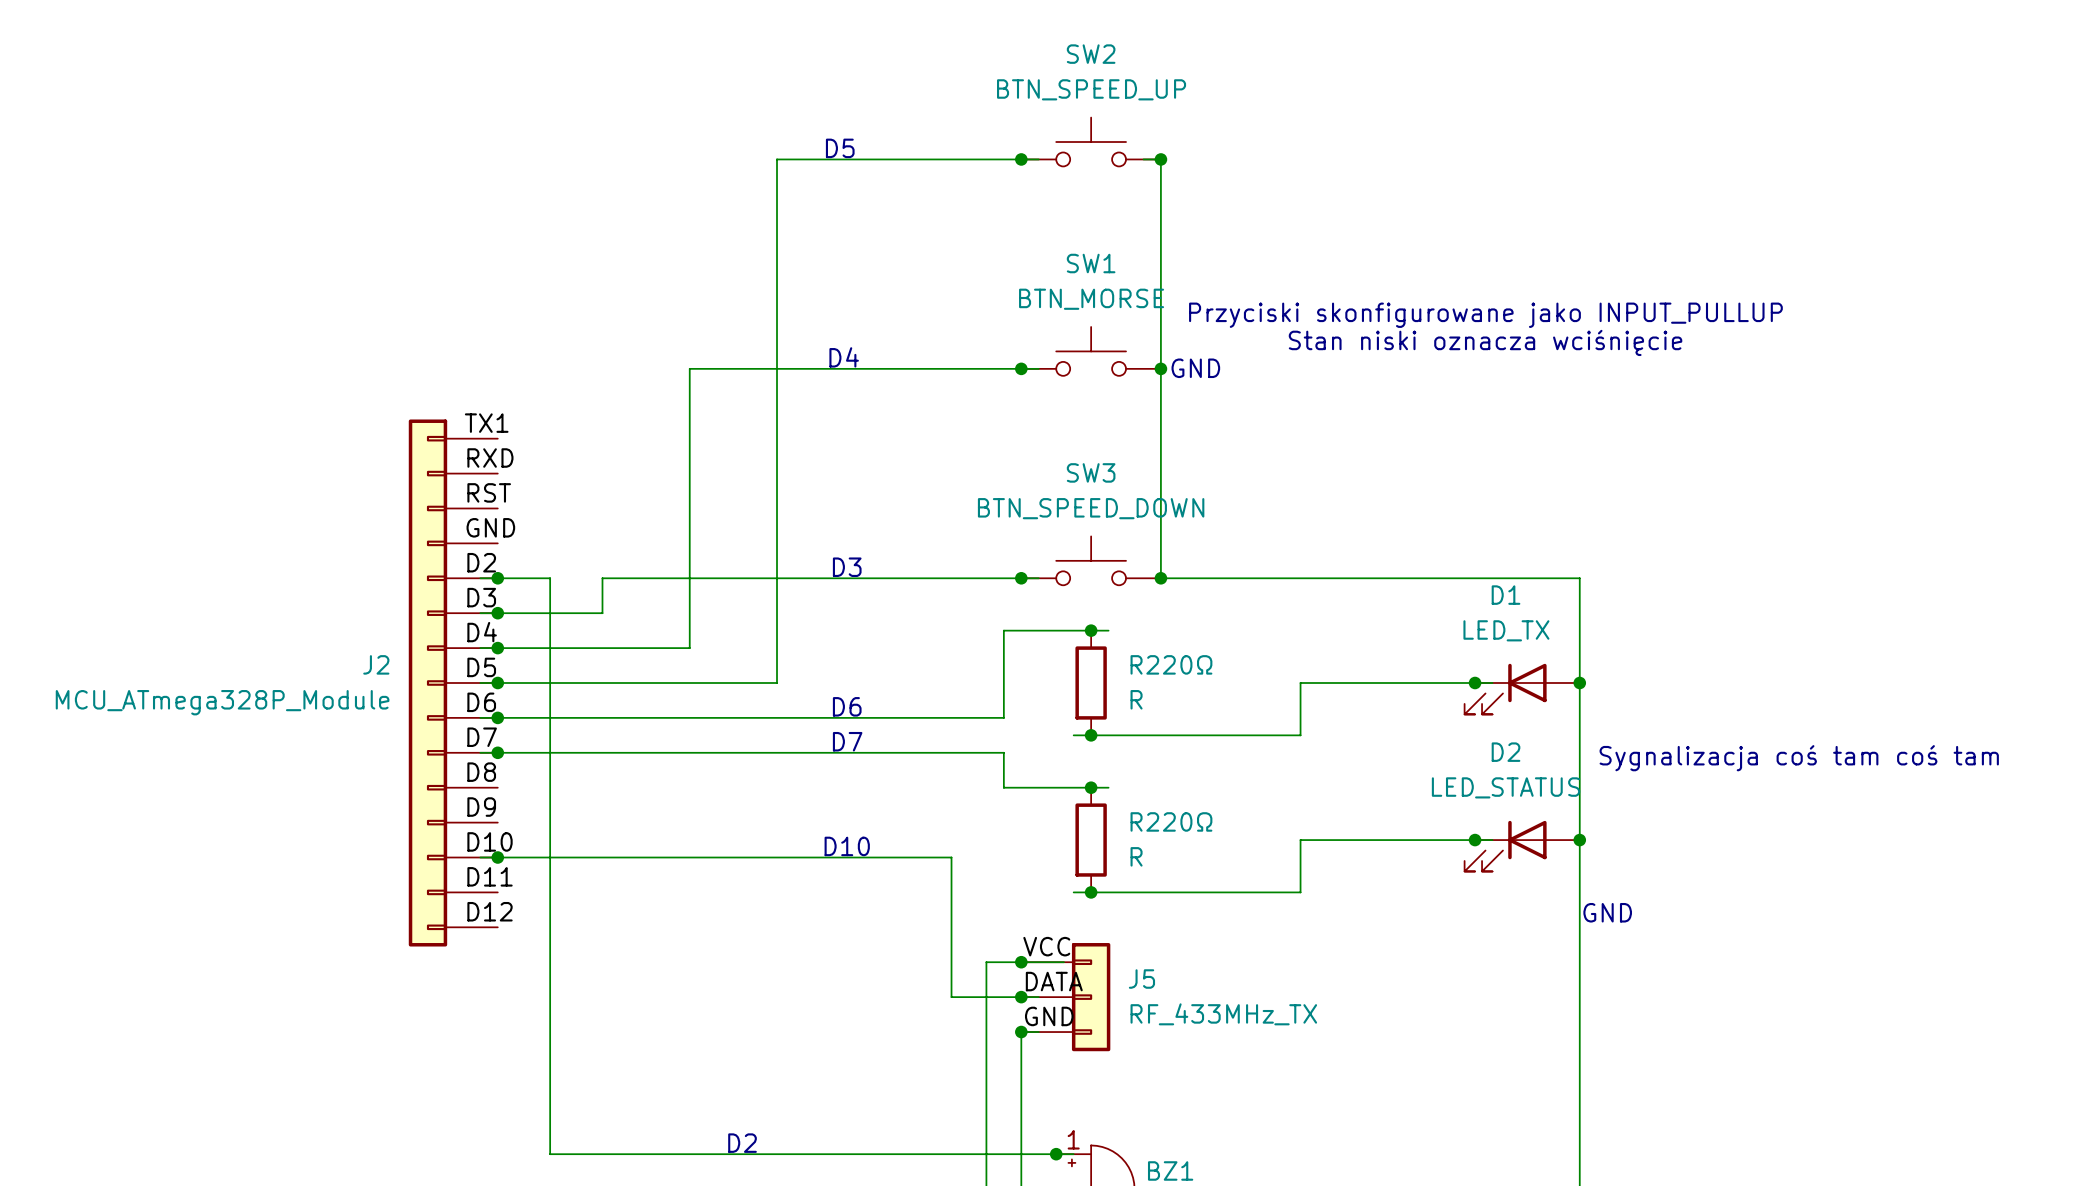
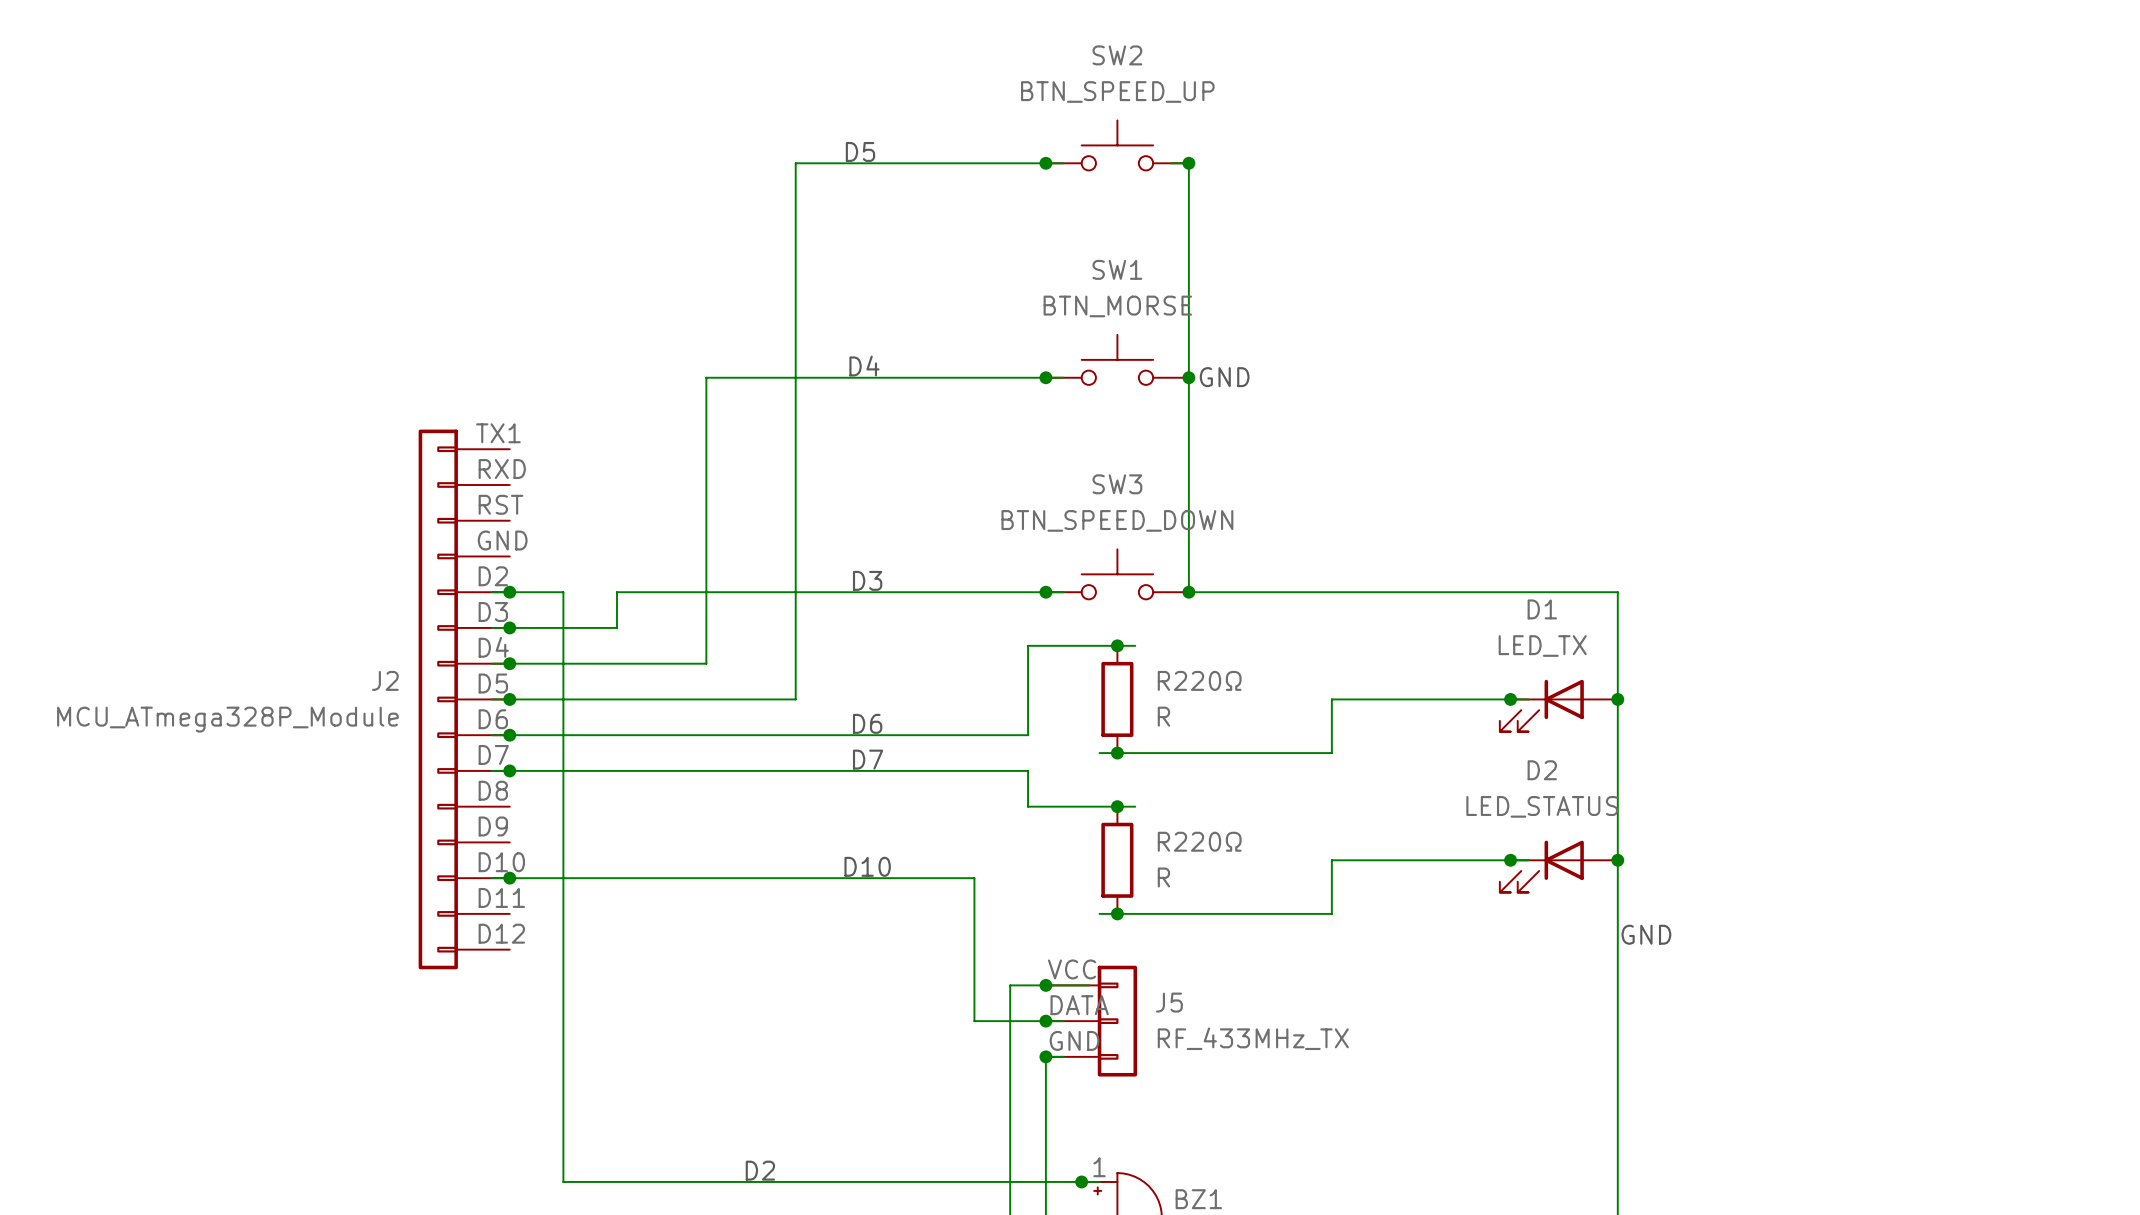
text: Przyciski skonfigurowane jako INPUT_PULLUP (1485, 315) -> none
text: Stan niski oznacza wciśnięcie (1485, 342) -> none
text: Sygnalizacja coś tam coś tam (1799, 758) -> none

